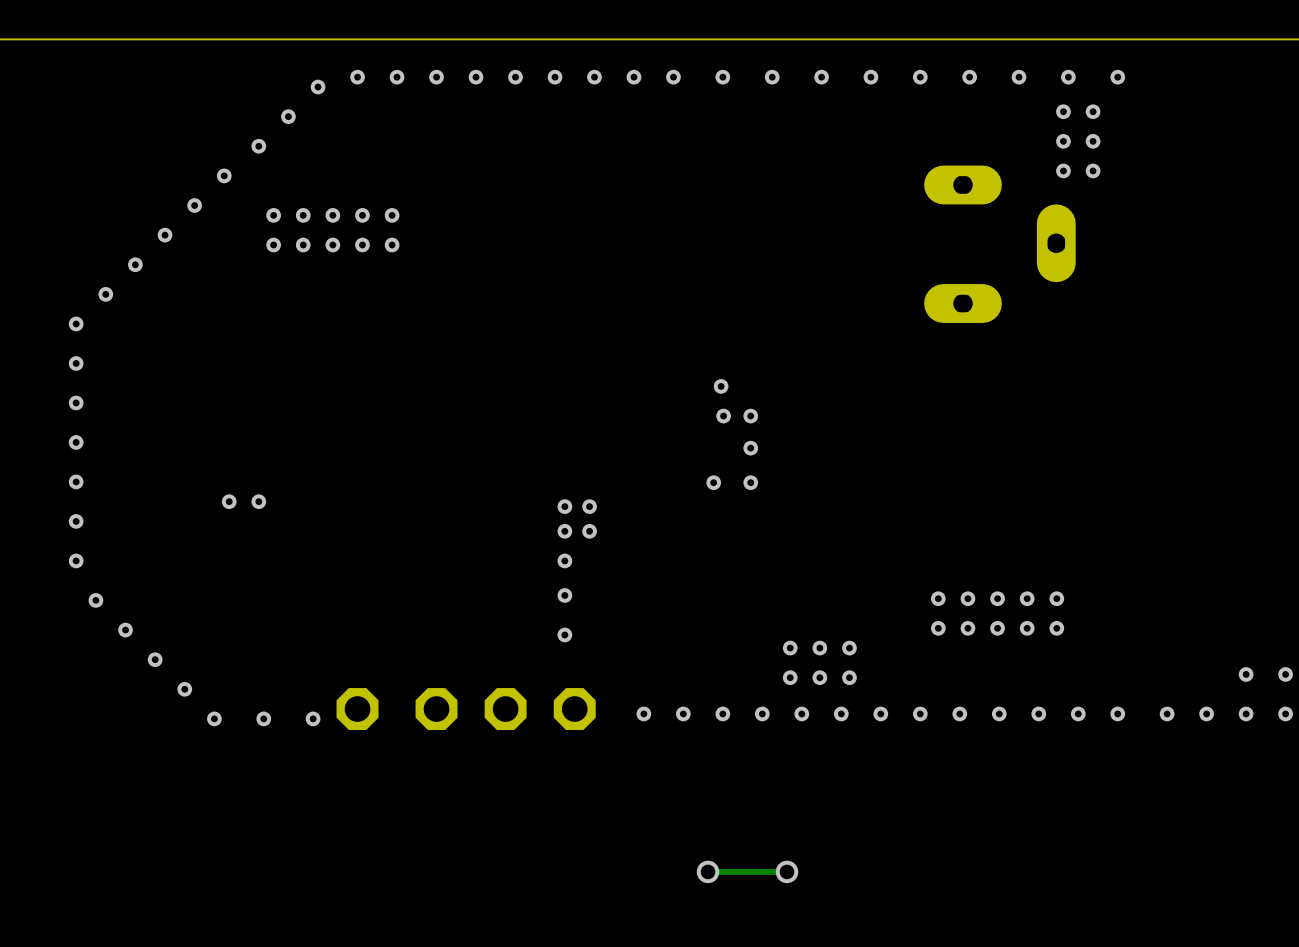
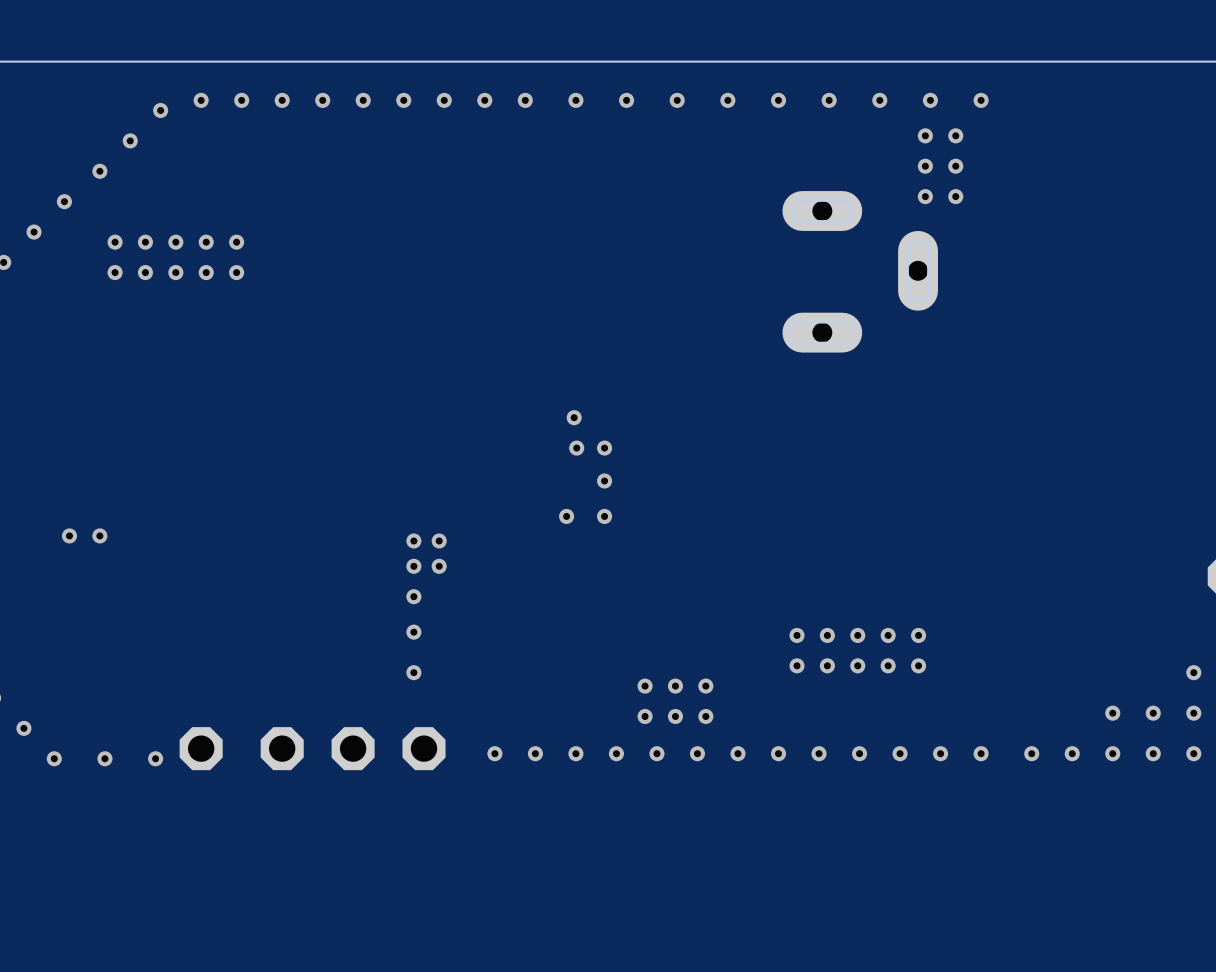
via: (708, 871) -> none
track: (787, 871) (708, 871) -> none
via: (787, 871) -> none

